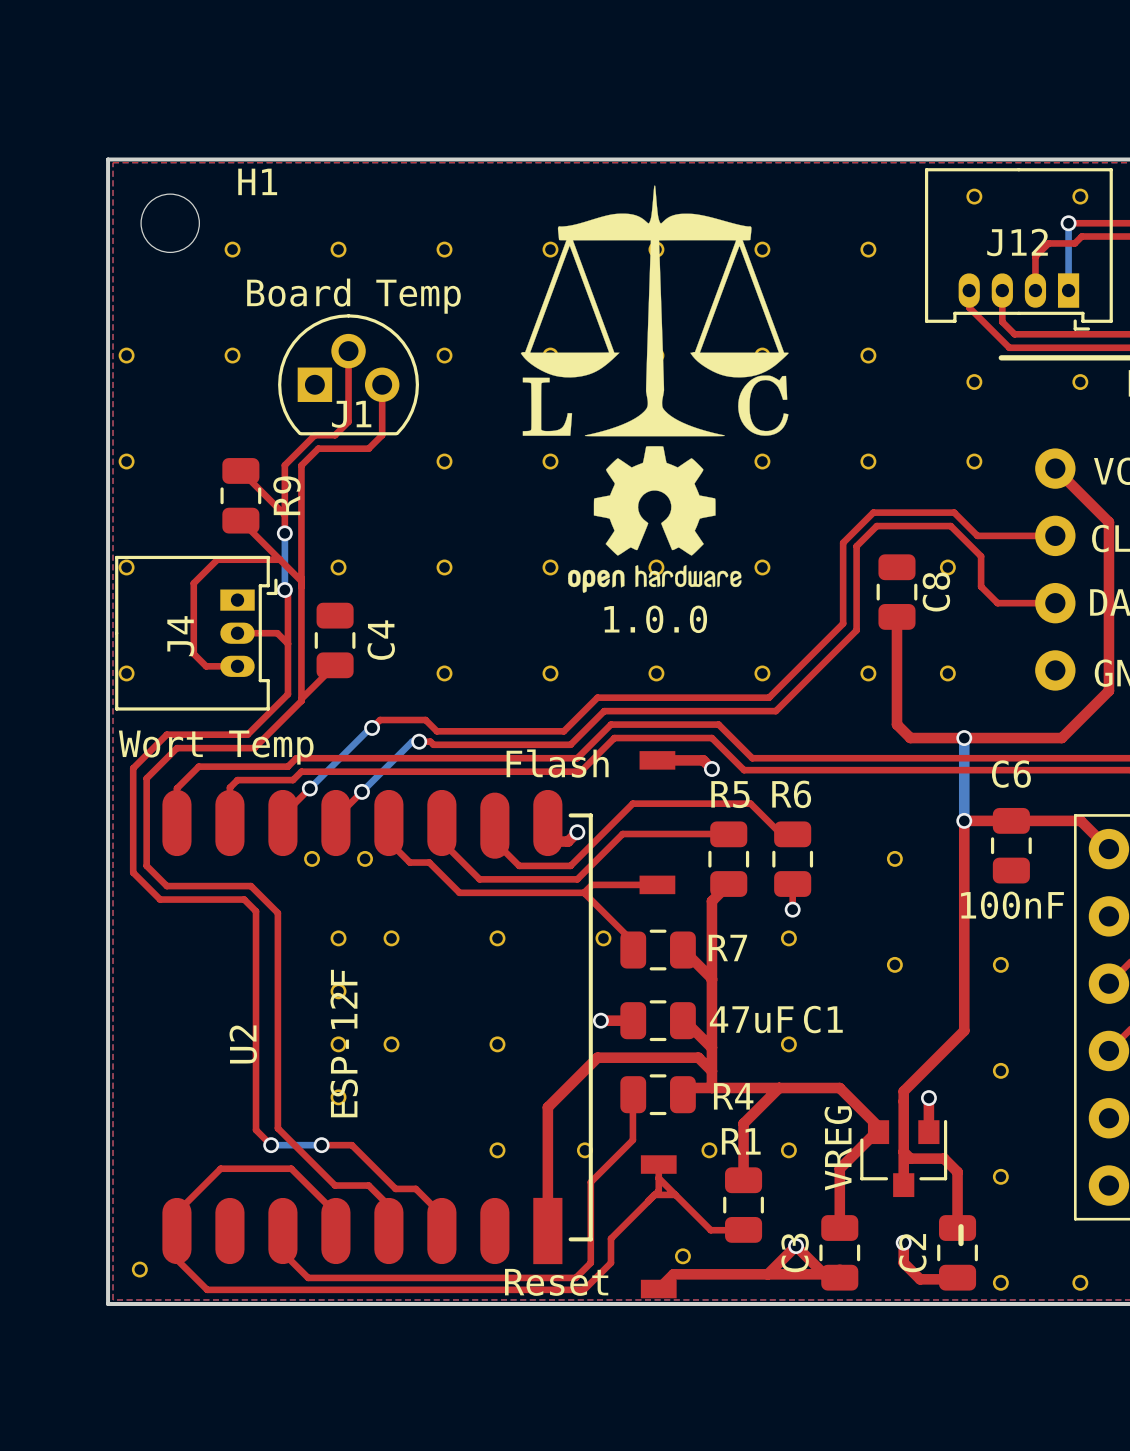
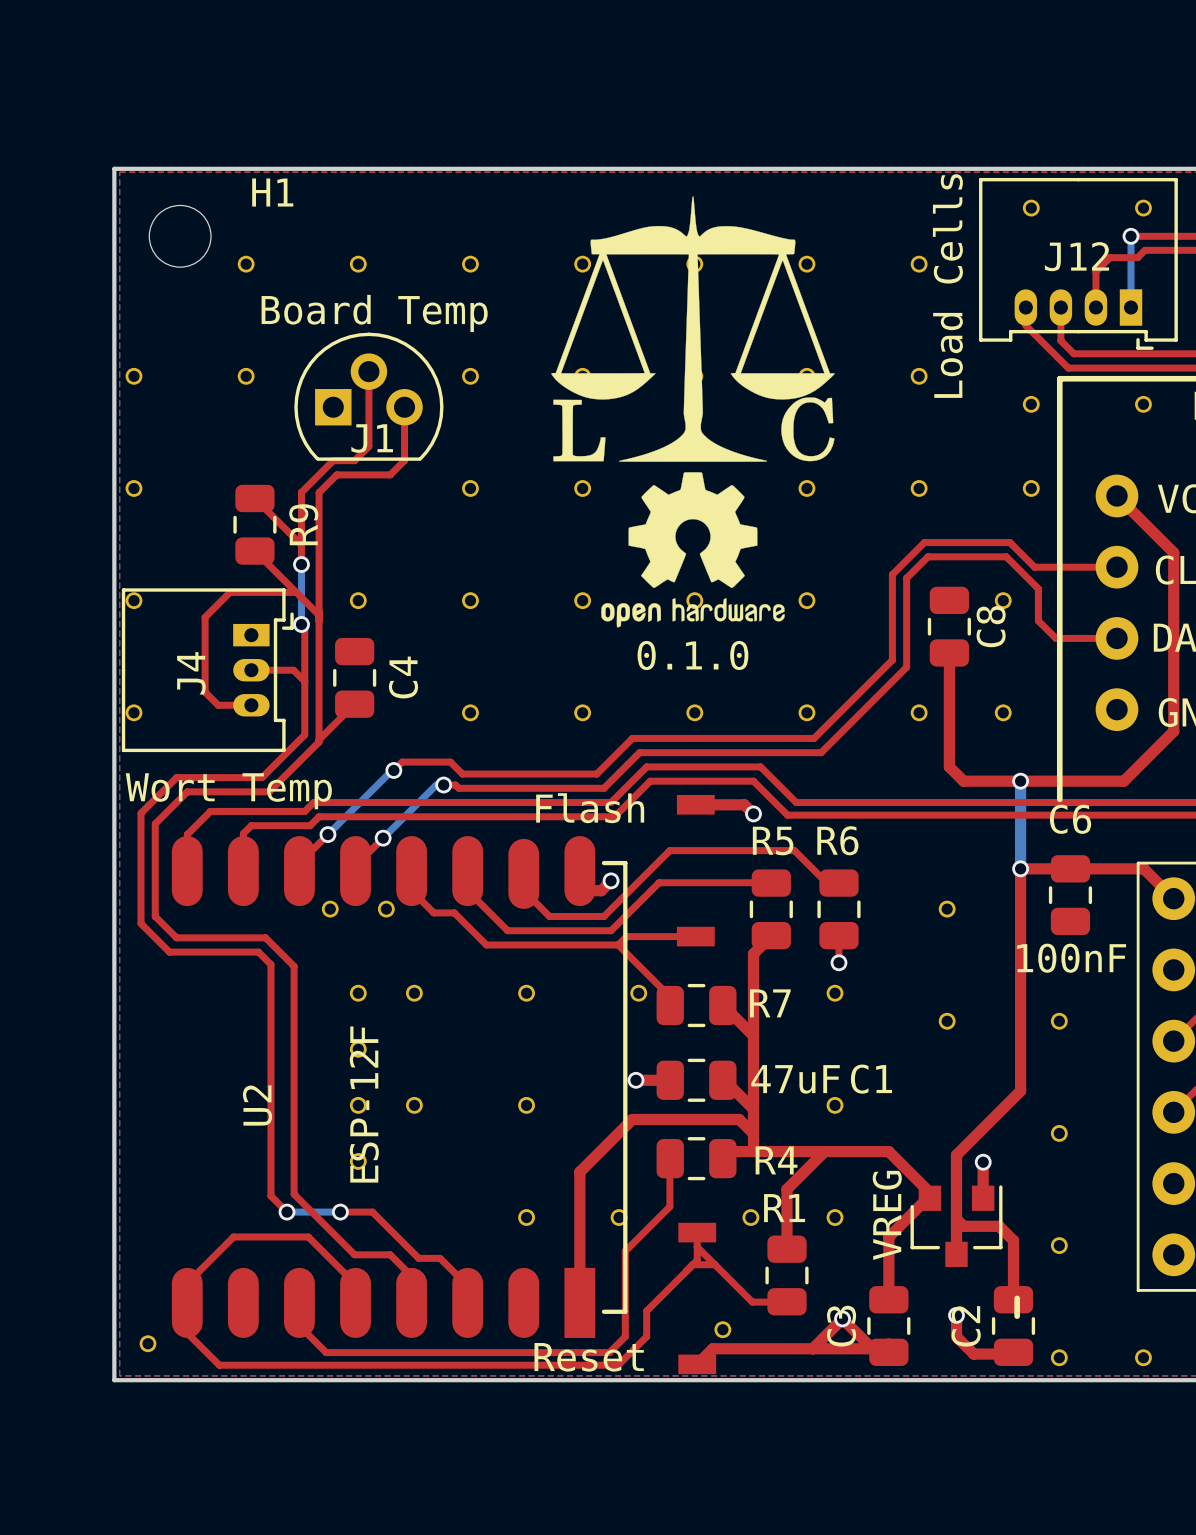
text: none -> Load Cells (947, 286)
line: none -> (1059, 378) (1059, 799)
text: 1.0.0 (655, 619) -> 0.1.0 (692, 655)

